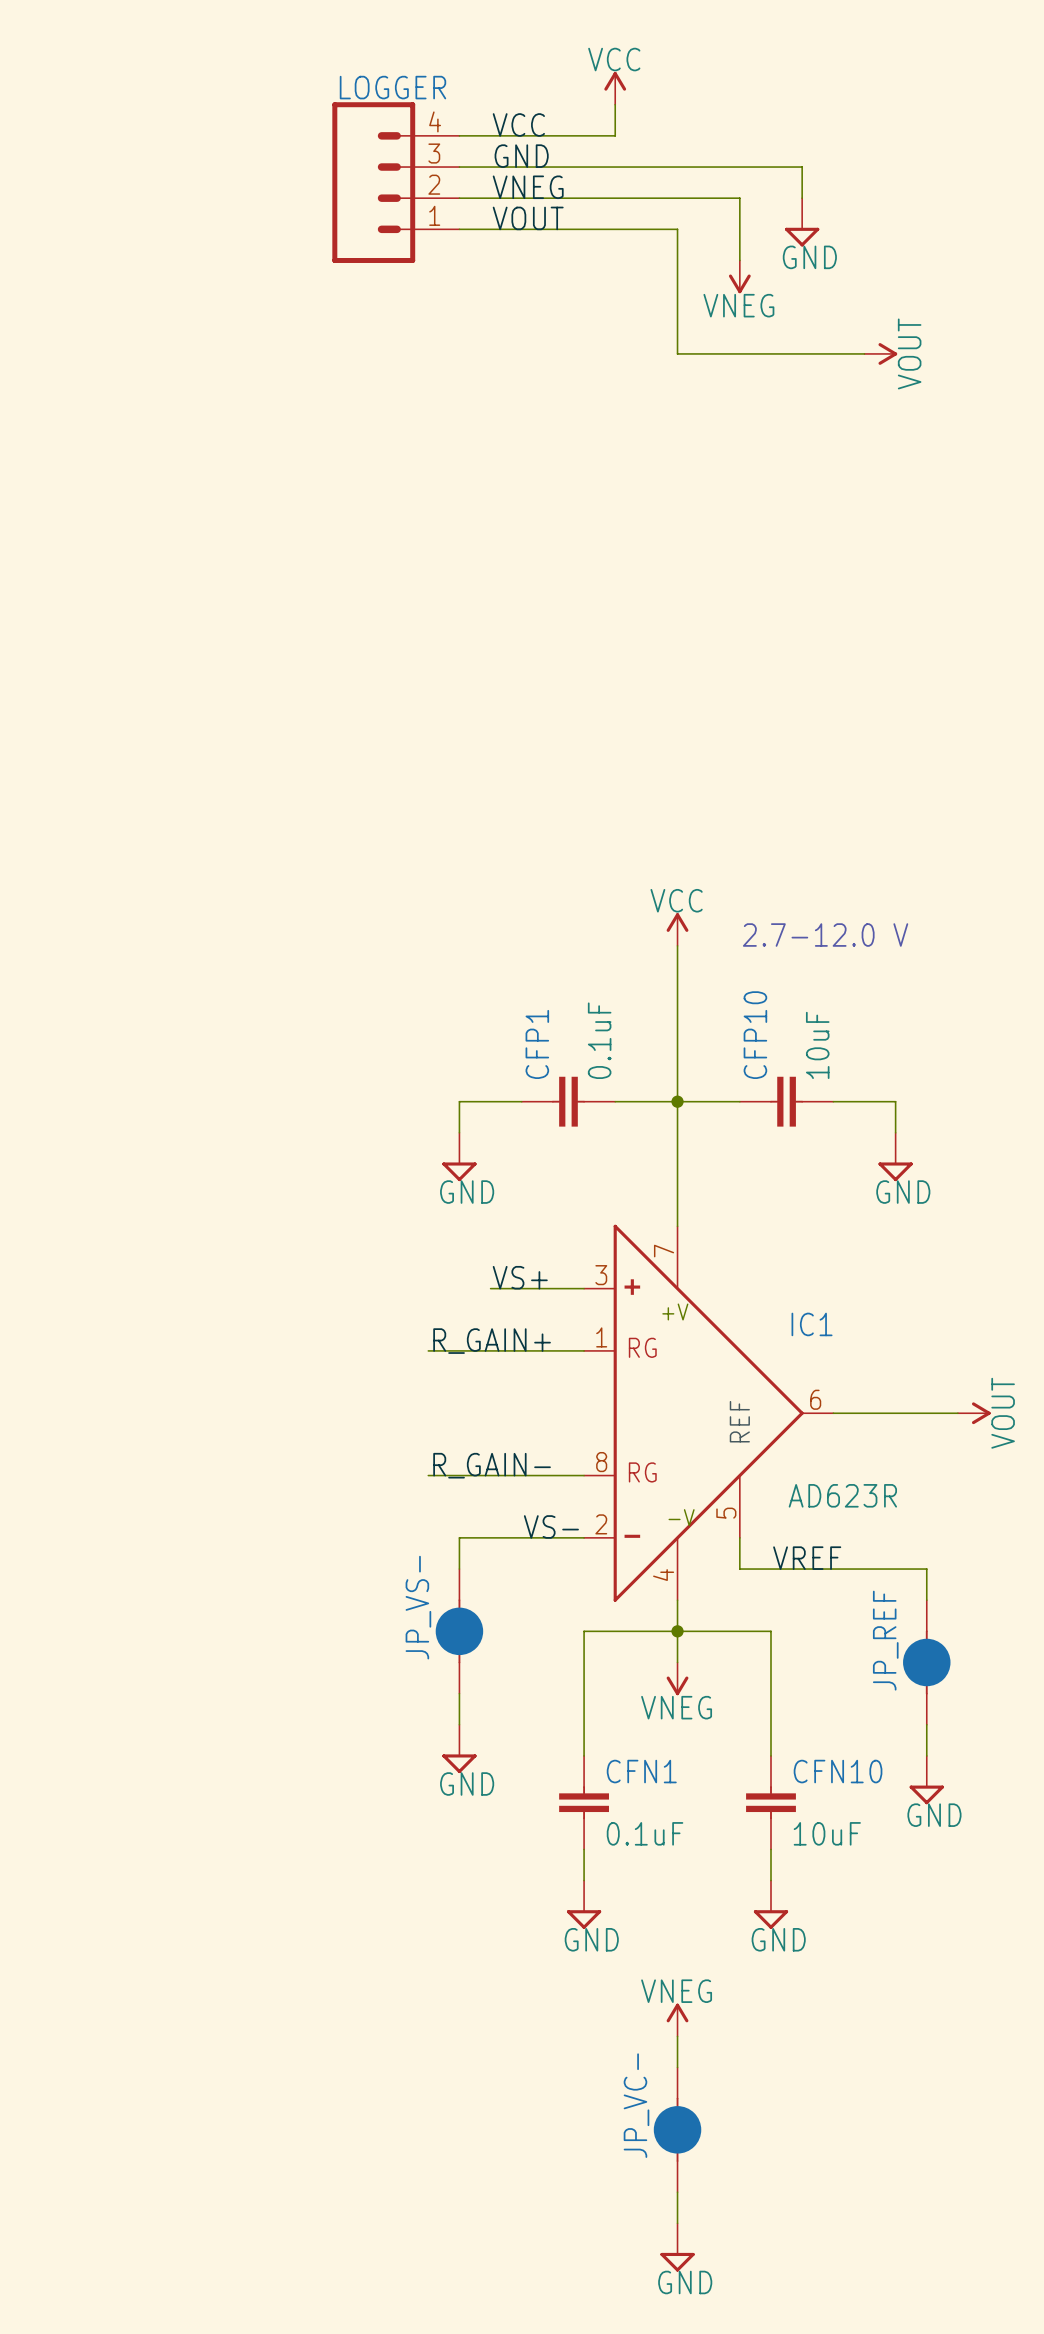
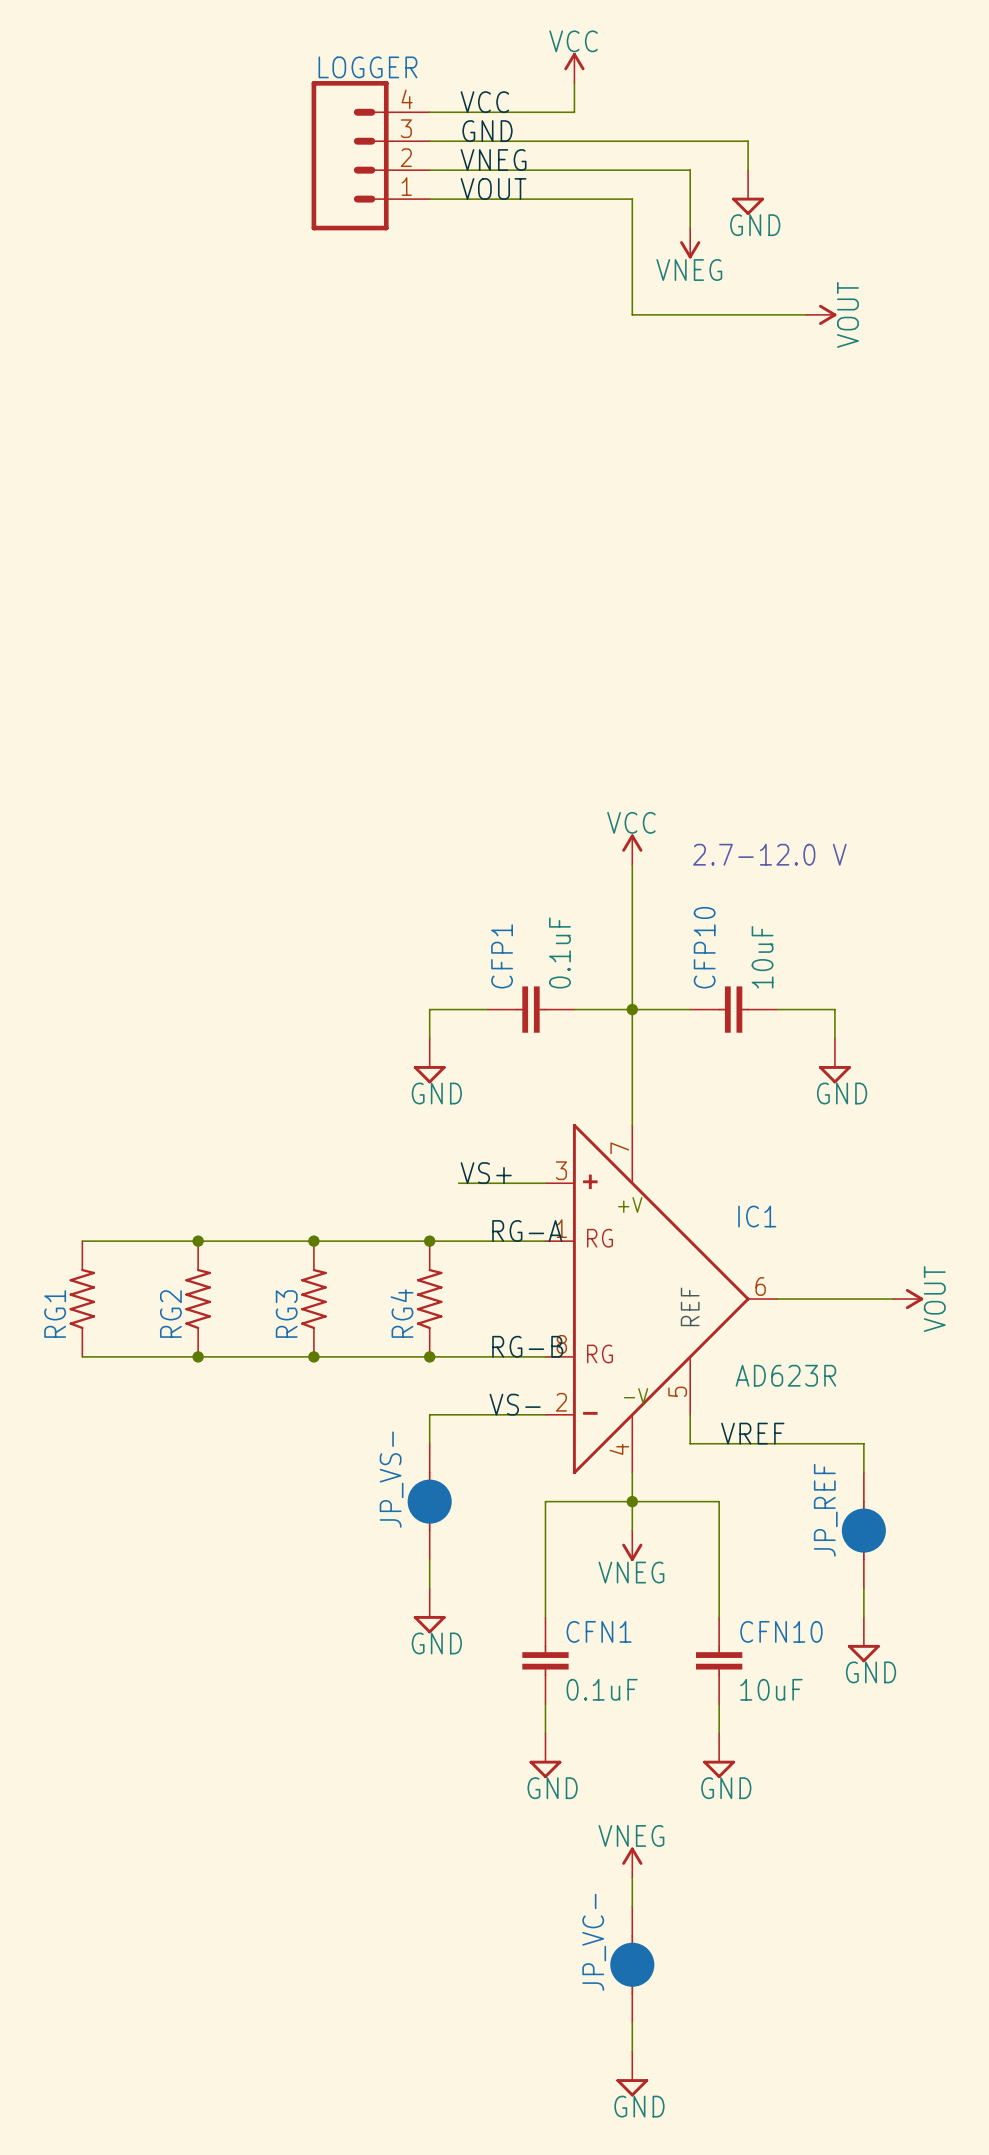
label: none -> RG-A (527, 1231)
label: R_GAIN+ (492, 1341) -> none
wire: none -> (82, 1241) (400, 1241)
junction: none -> (198, 1241)
junction: none -> (313, 1241)
junction: none -> (429, 1241)
RG1: none -> (82, 1299)
RG2: none -> (198, 1299)
RG3: none -> (313, 1299)
RG4: none -> (429, 1299)
label: none -> RG-B (527, 1346)
label: R_GAIN- (492, 1465) -> none
wire: none -> (82, 1356) (400, 1356)
junction: none -> (198, 1356)
junction: none -> (313, 1356)
junction: none -> (429, 1356)

